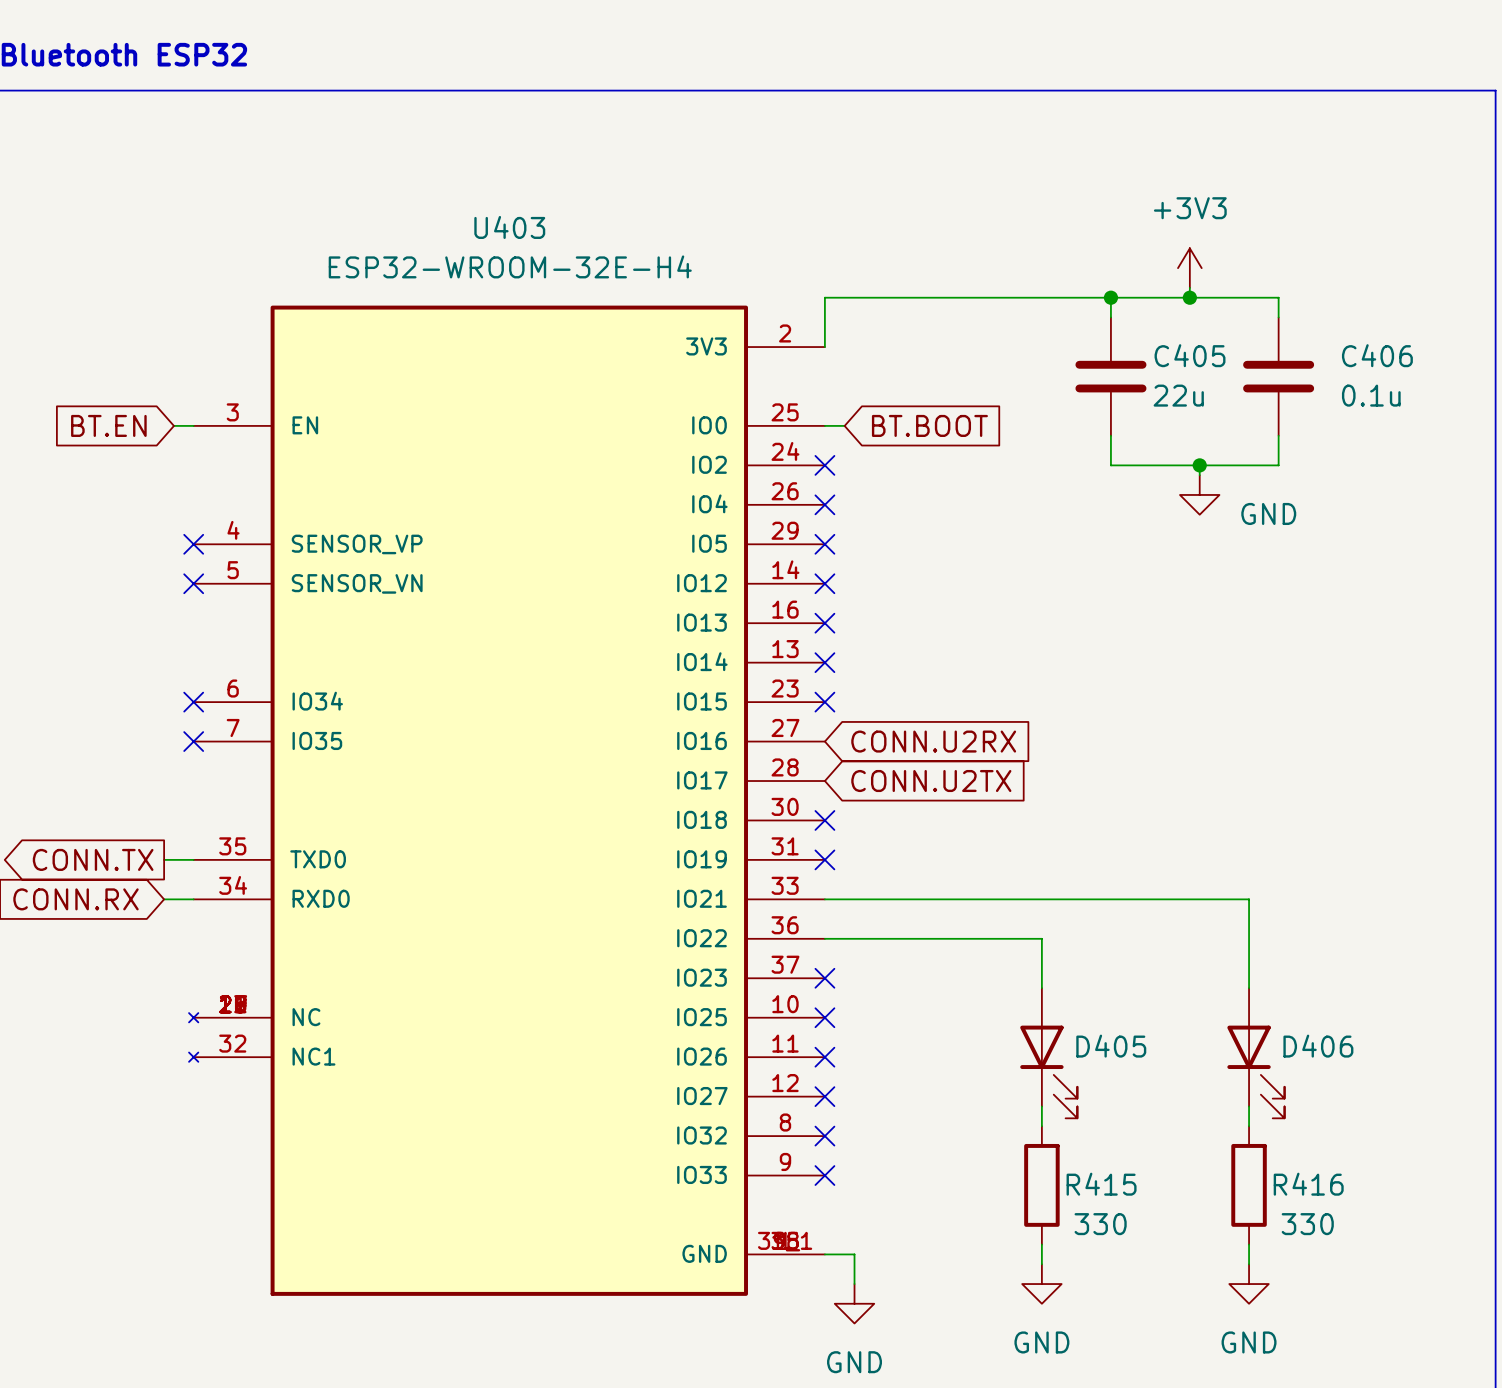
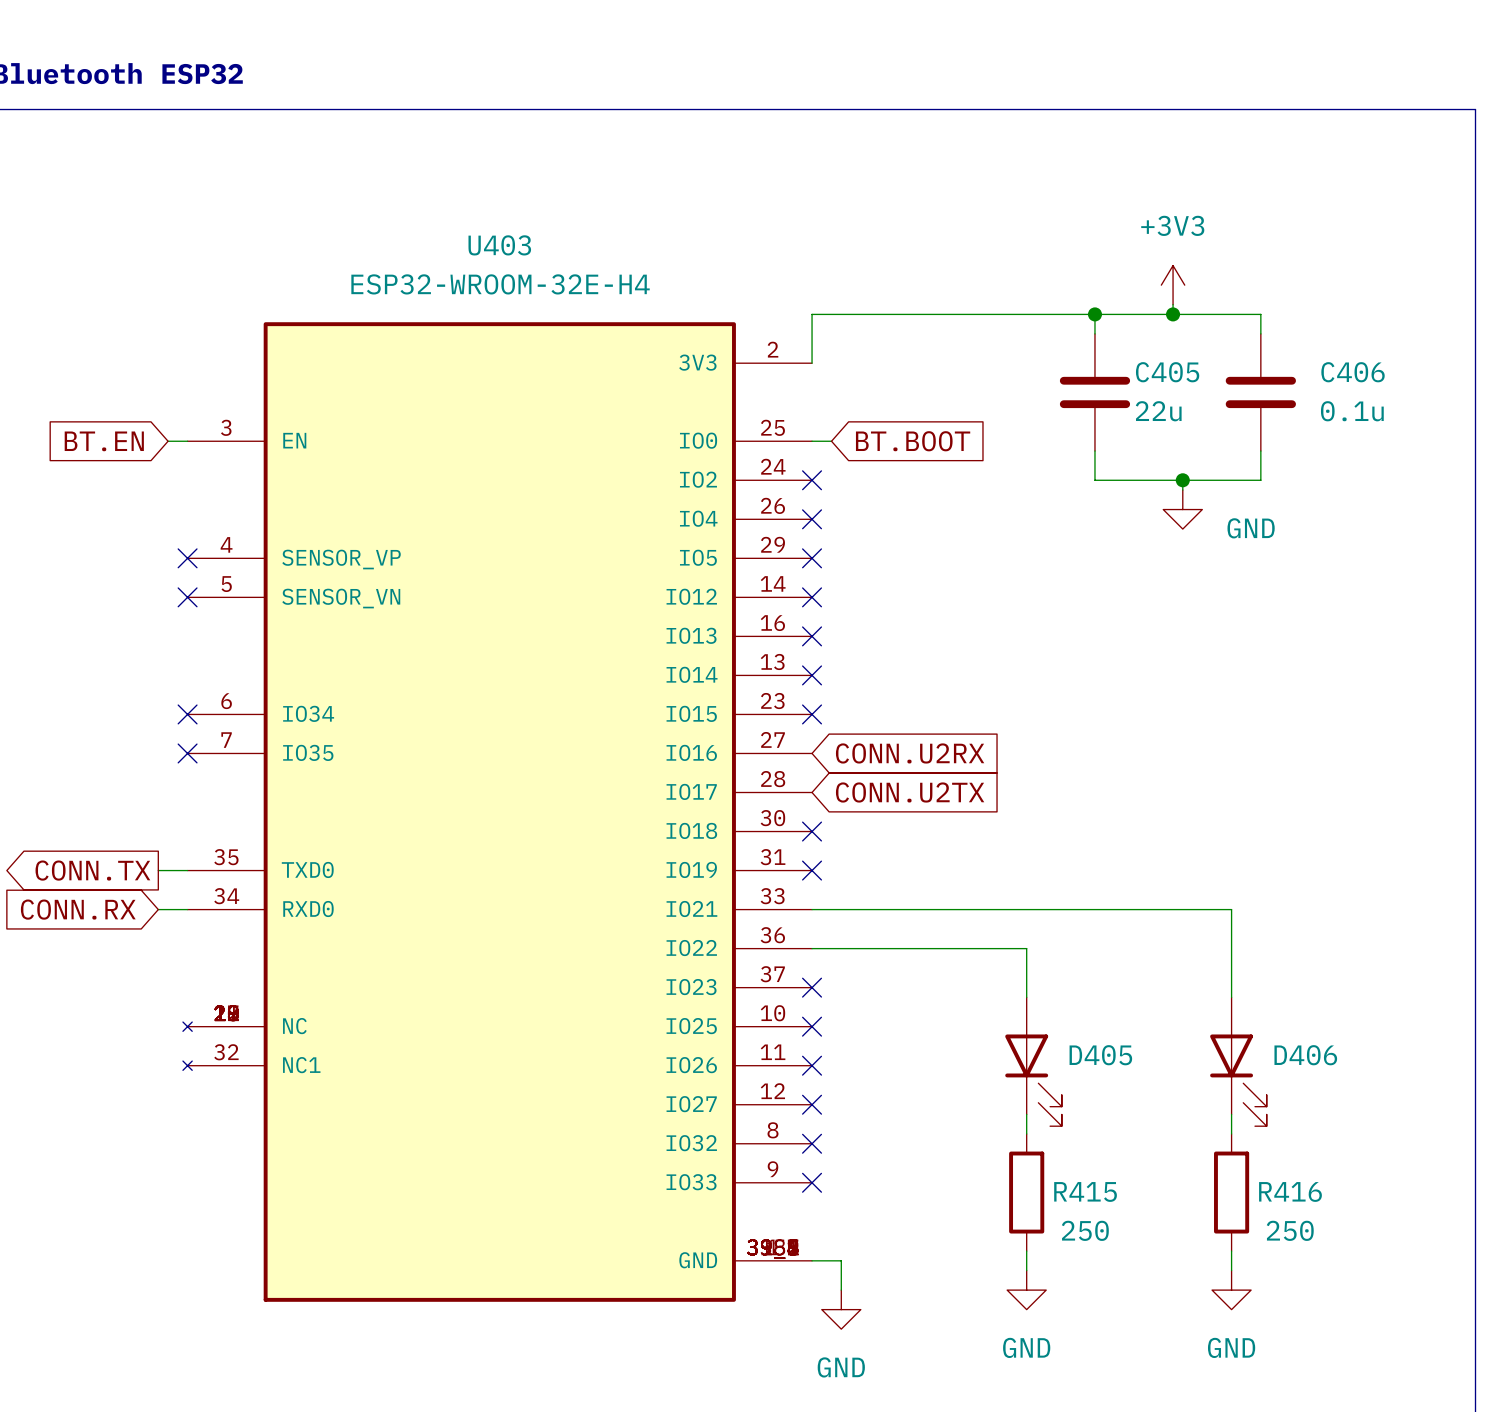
U403 symbol: [189, 305, 825, 1296] -> [182, 322, 813, 1302]
R415 value: 330 (1100, 1224) -> 250 (1085, 1230)
R416 value: 330 (1307, 1224) -> 250 (1290, 1230)

